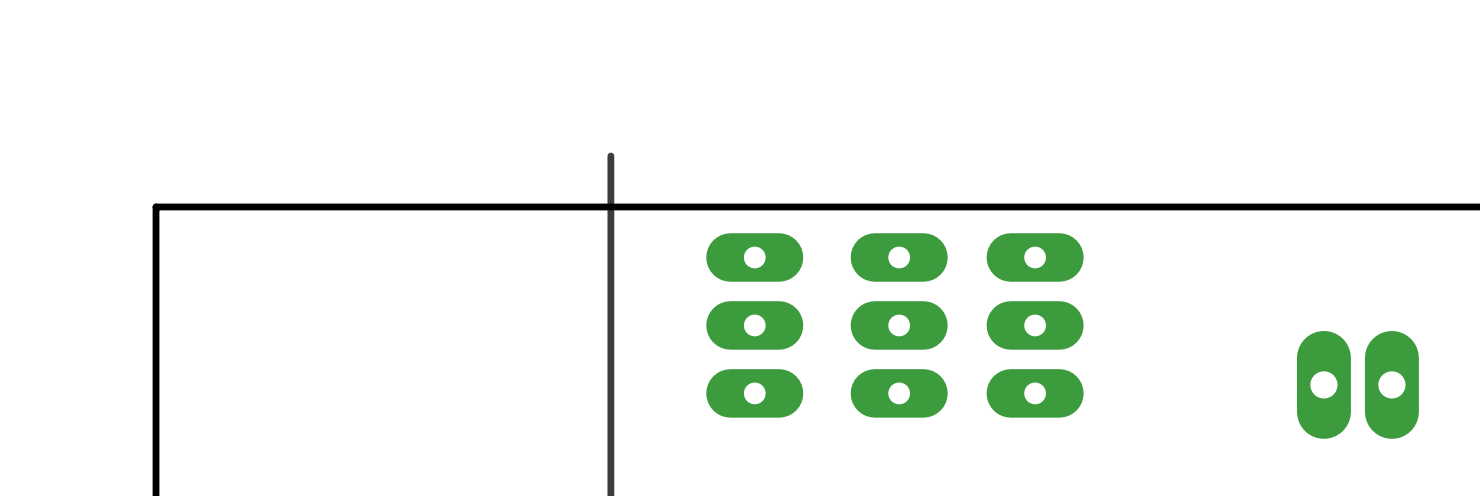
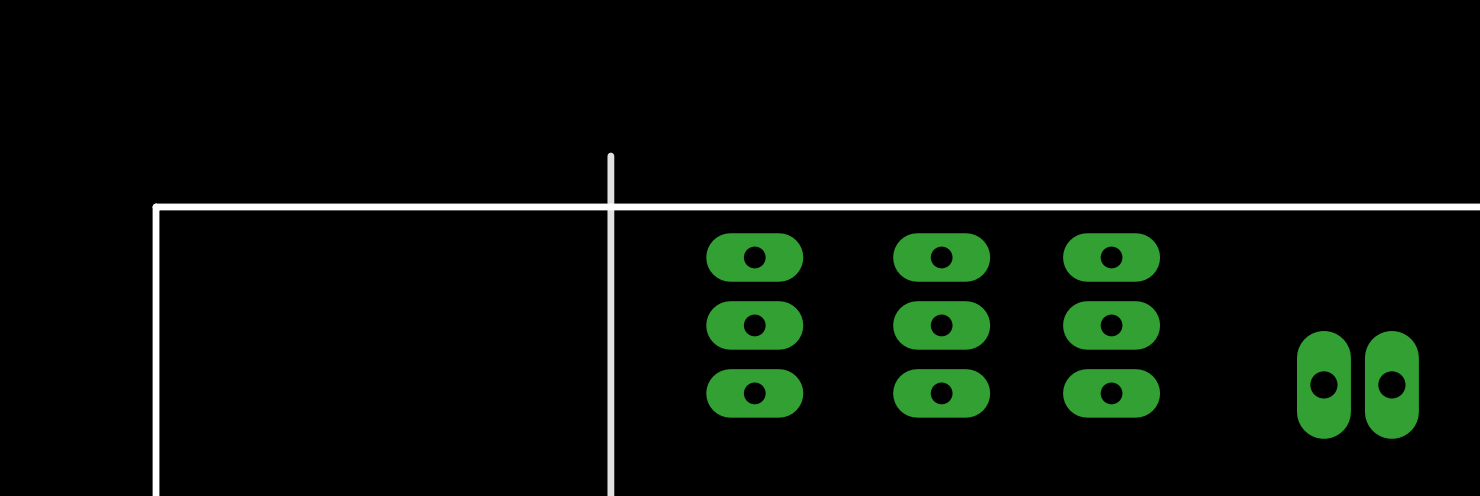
part position: (899, 325) -> (941, 325)
part: (1035, 325) -> none
part: none -> (1111, 325)

